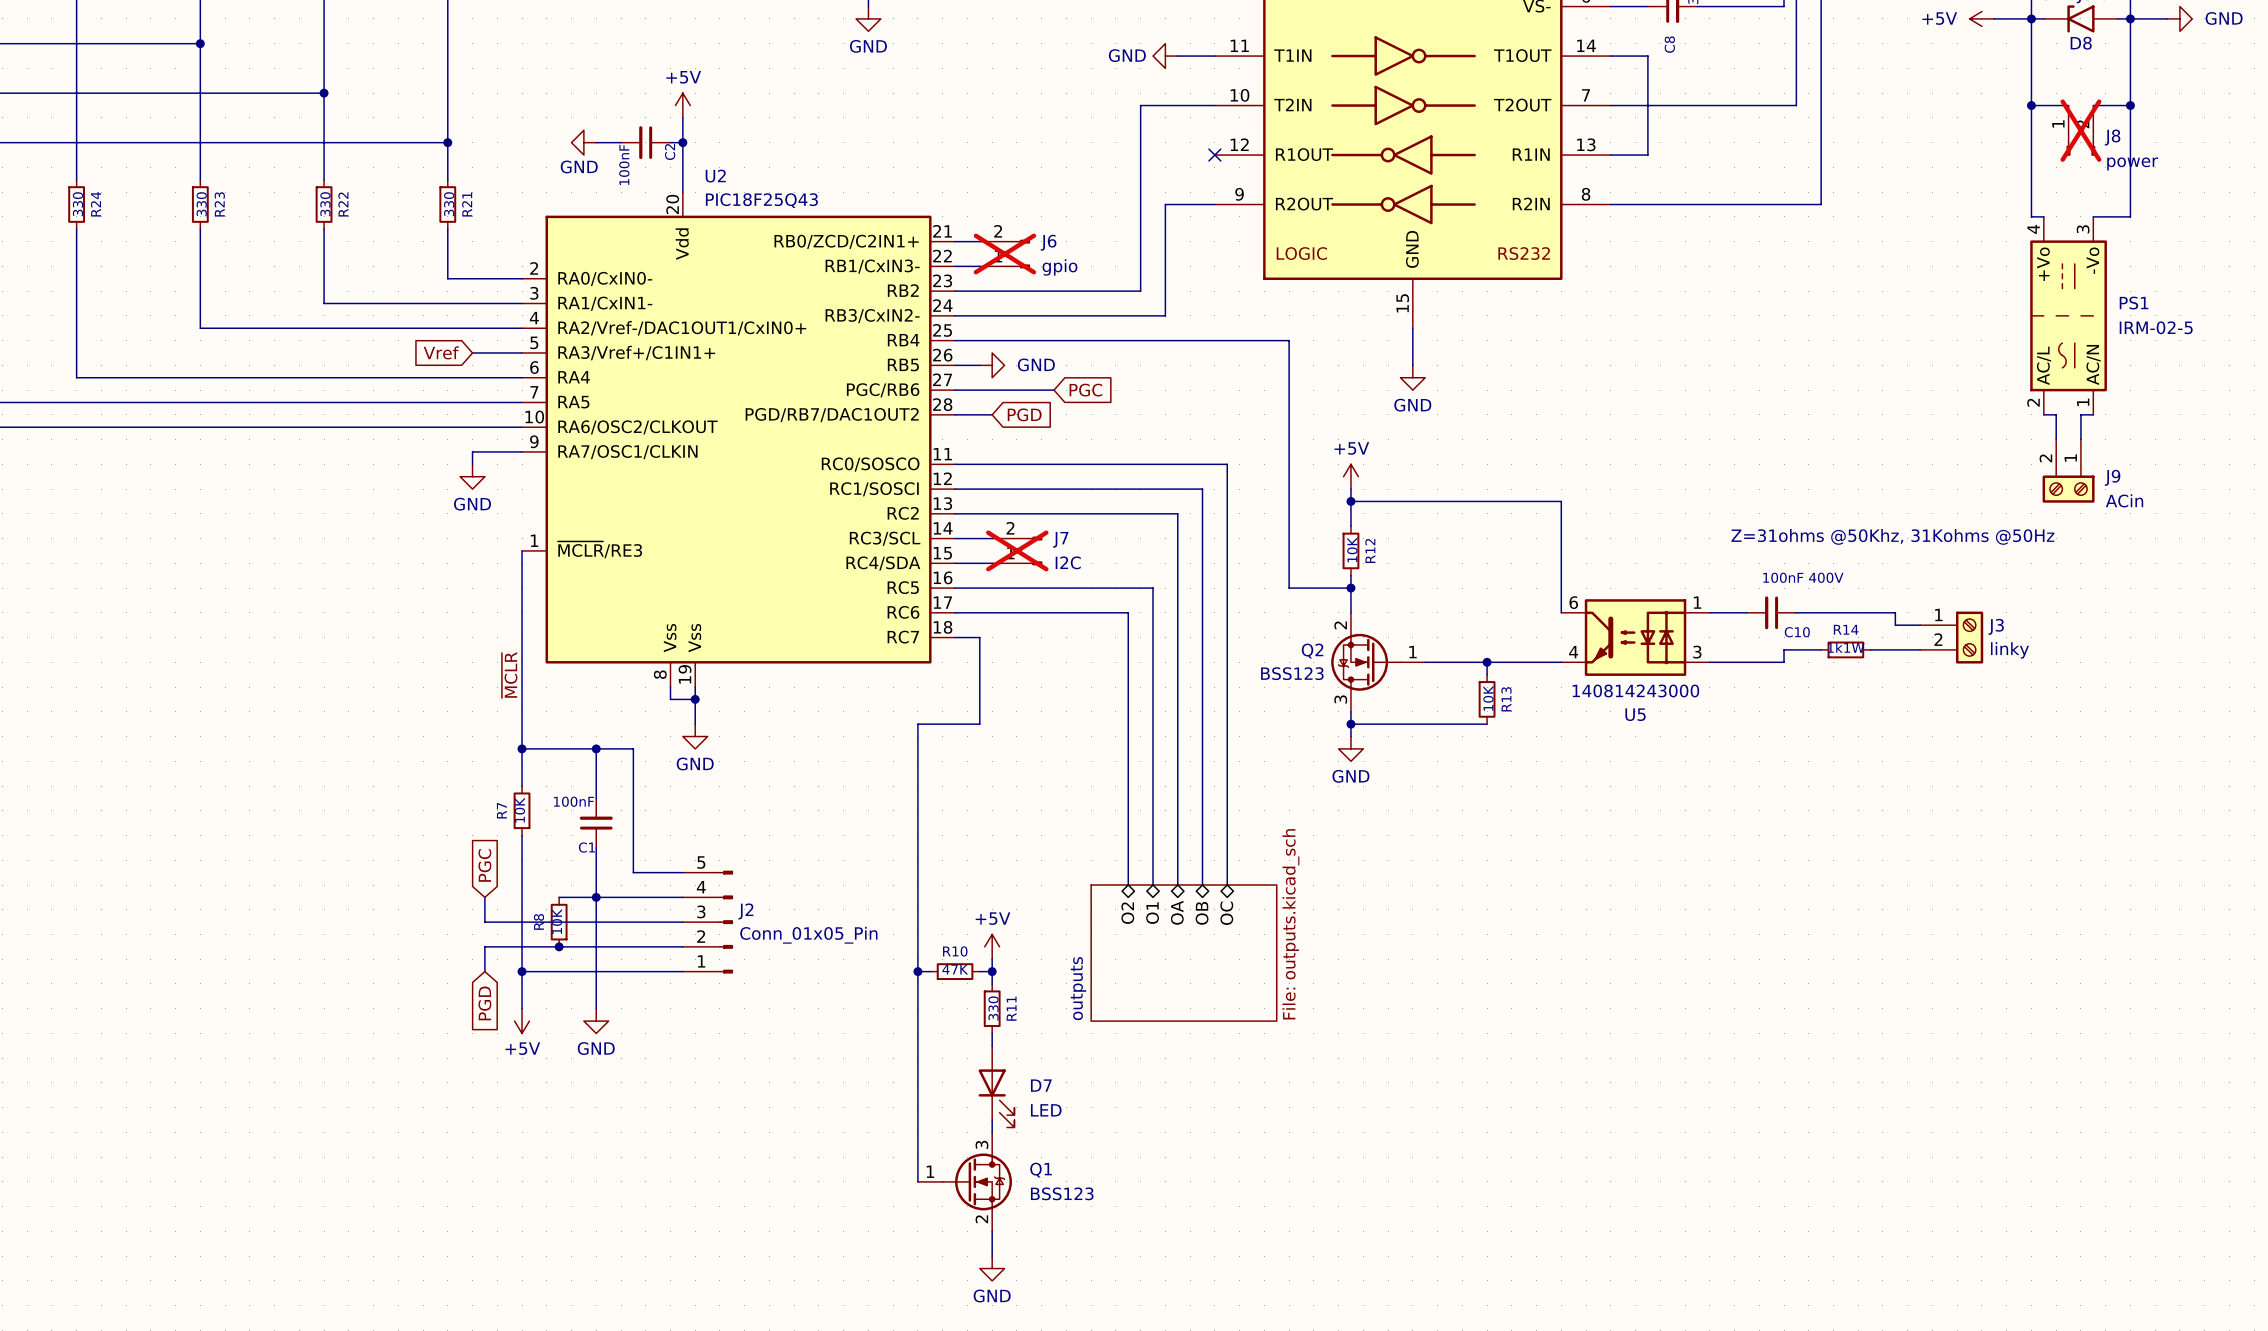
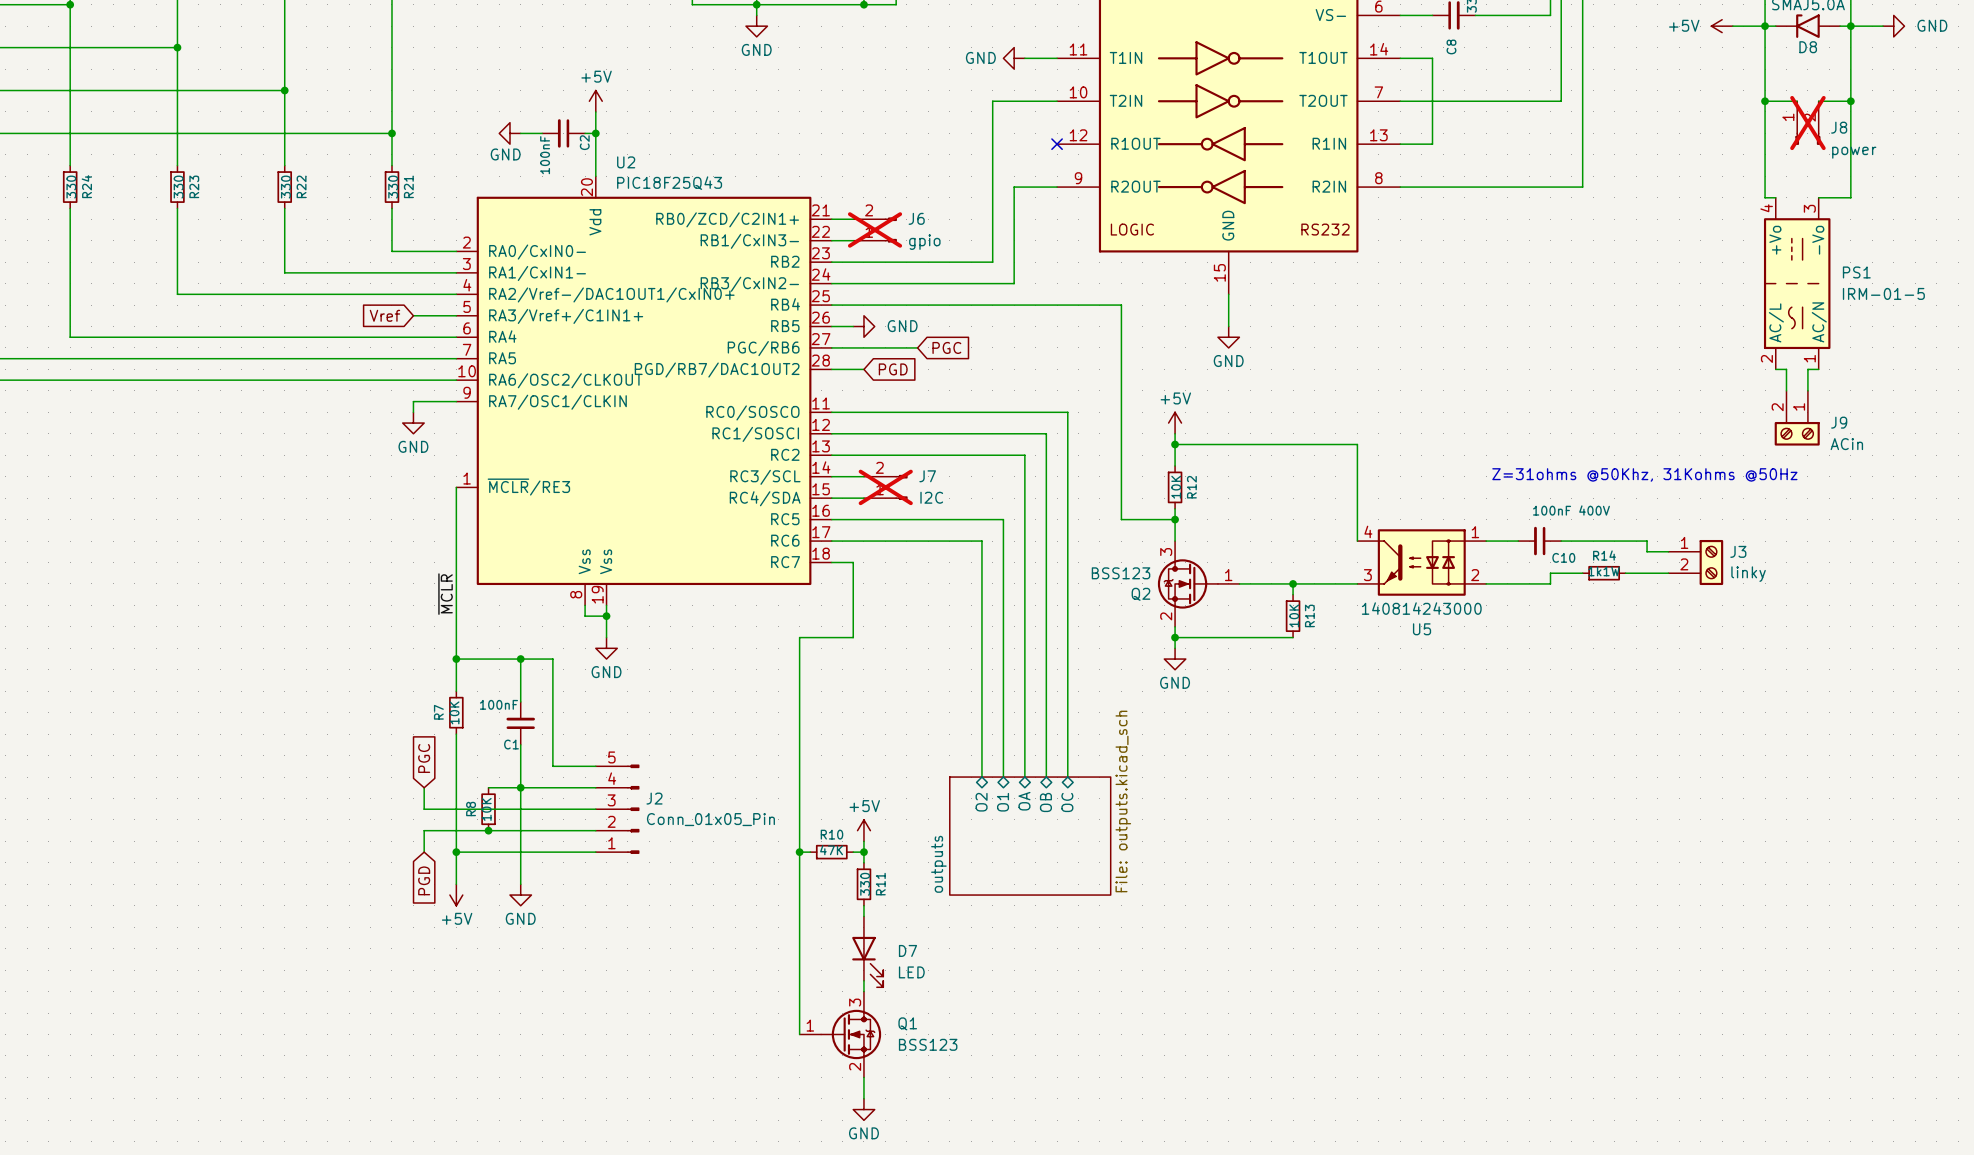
PS1 value: IRM-02-5 (2156, 327) -> IRM-01-5 (1883, 293)
U5 symbol: [1561, 599, 1710, 676] -> [1357, 529, 1487, 596]
Q2 flip: as is (1365, 662) -> up-down (1187, 583)

